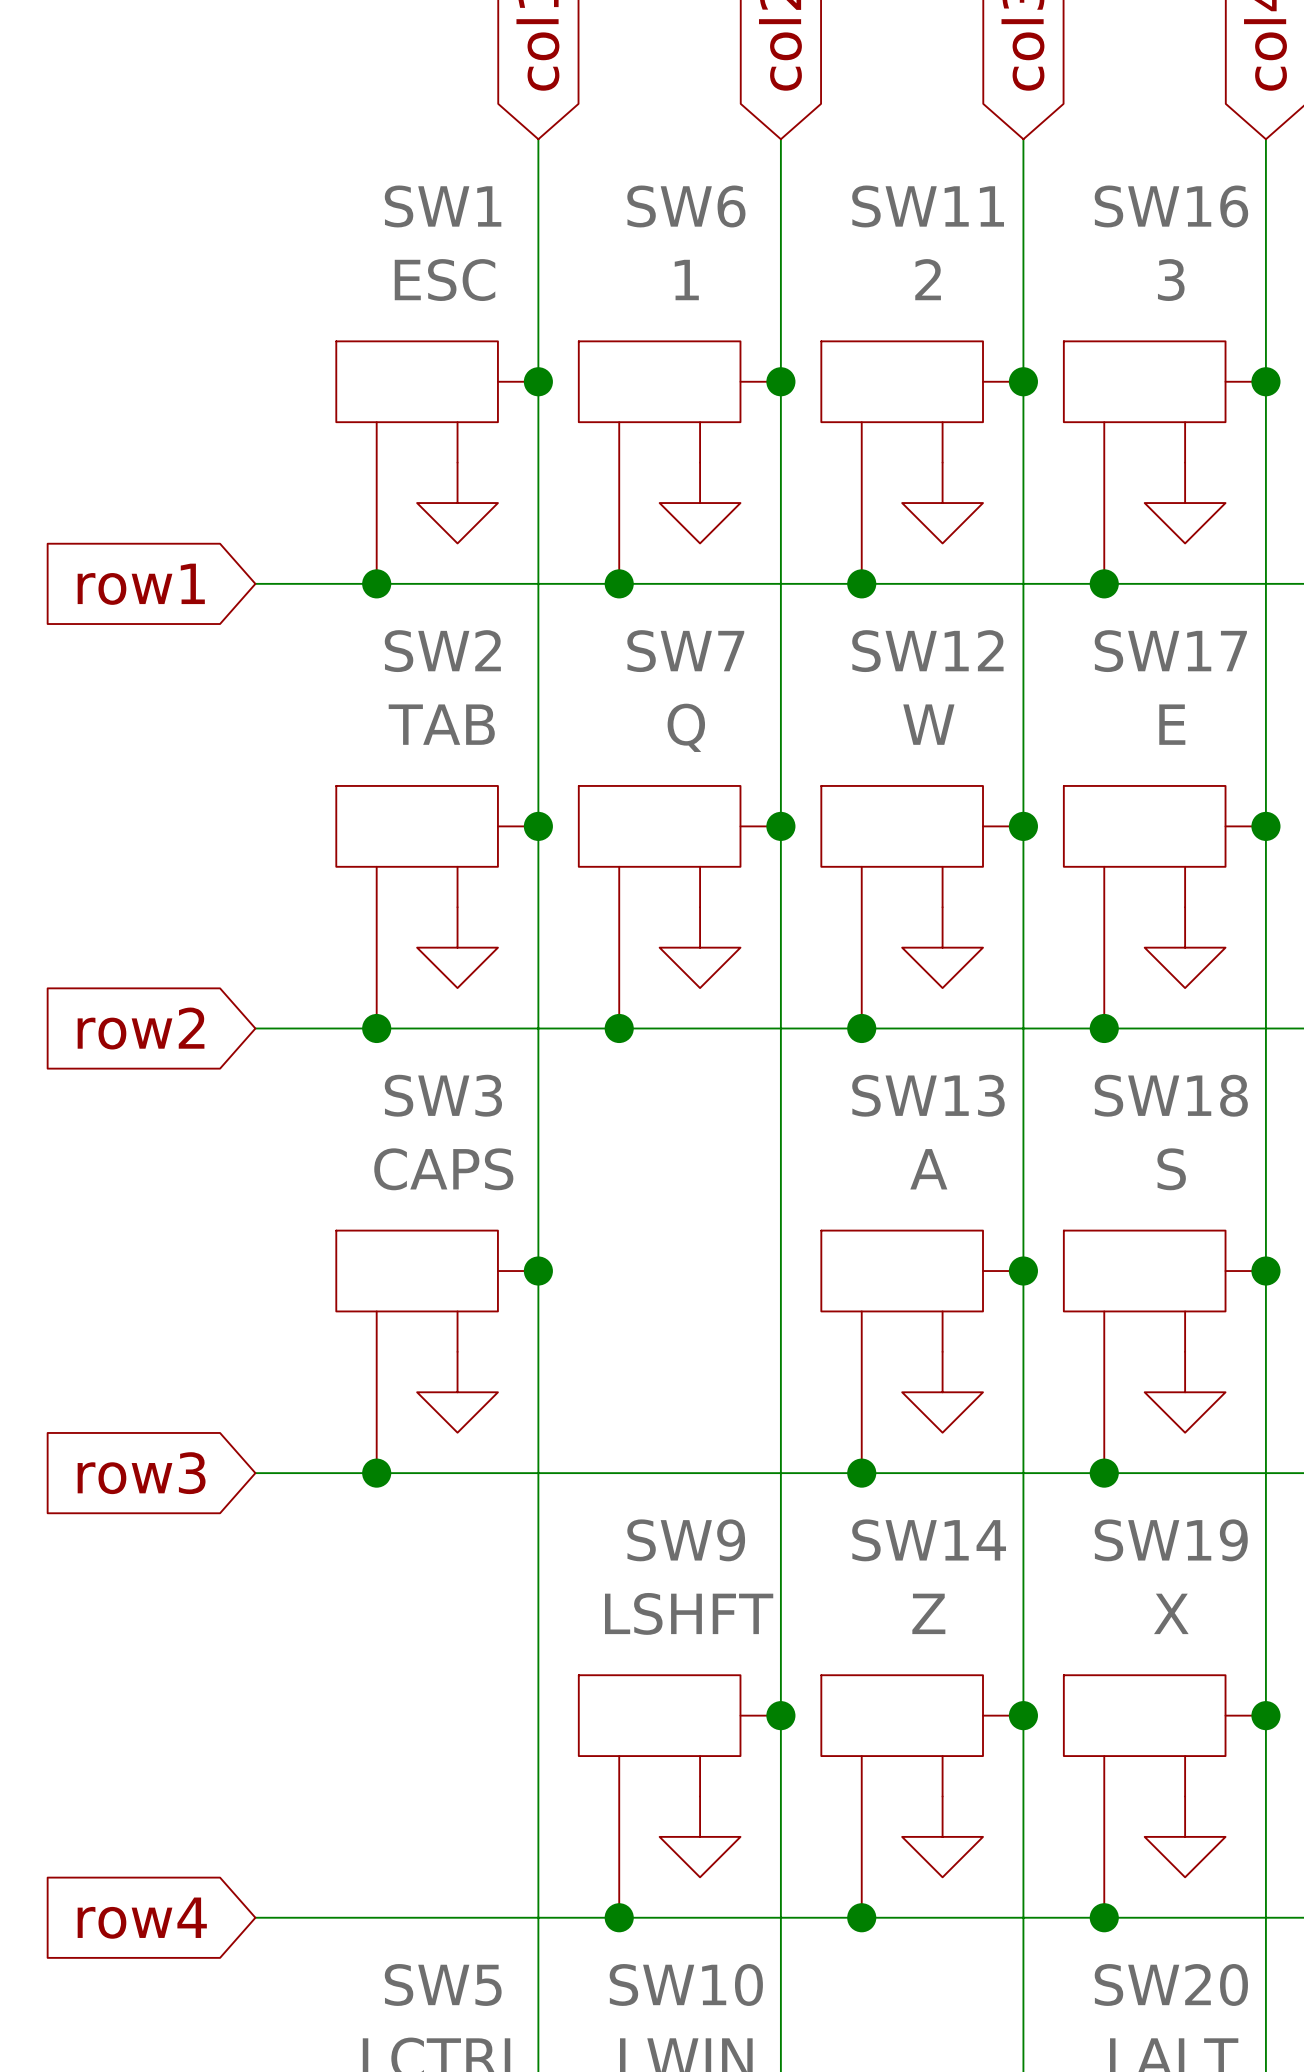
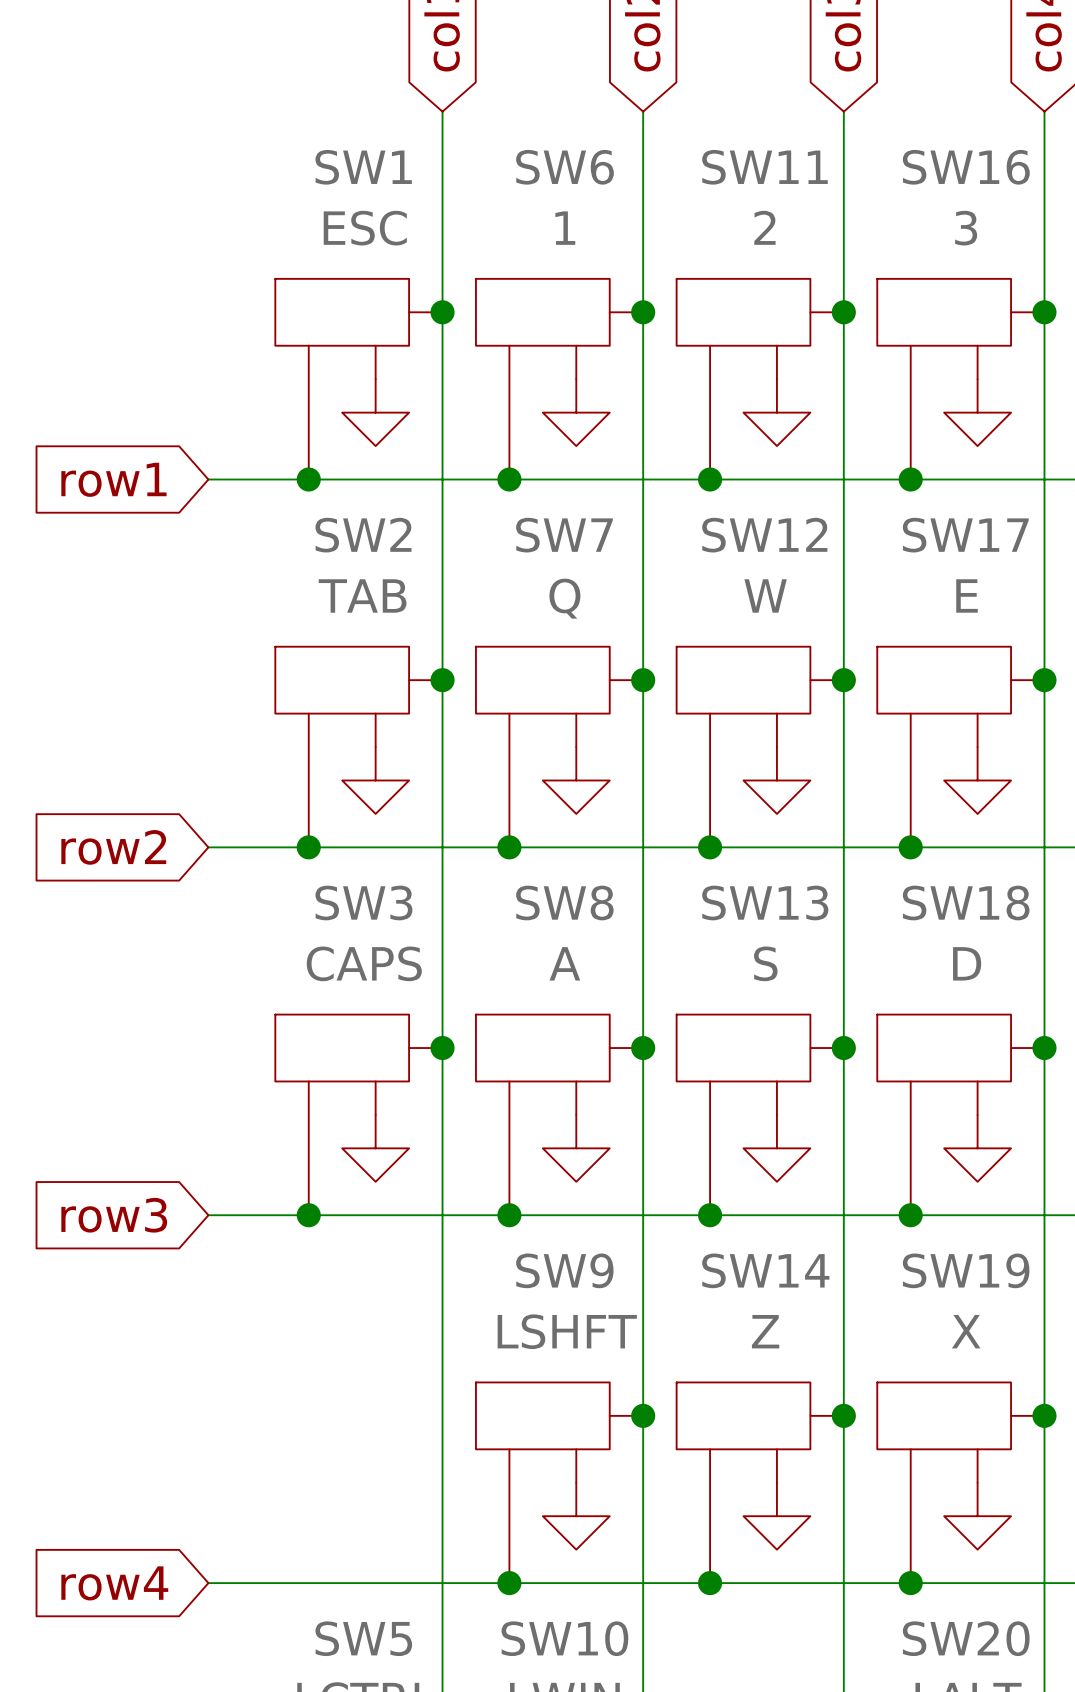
SW13 value: A (928, 1169) -> S (765, 963)
SW18 value: S (1171, 1169) -> D (967, 963)
junction: none -> (643, 1048)
SW8: none -> A (559, 1114)
power symbol: none -> (576, 1148)
junction: none -> (509, 1215)

